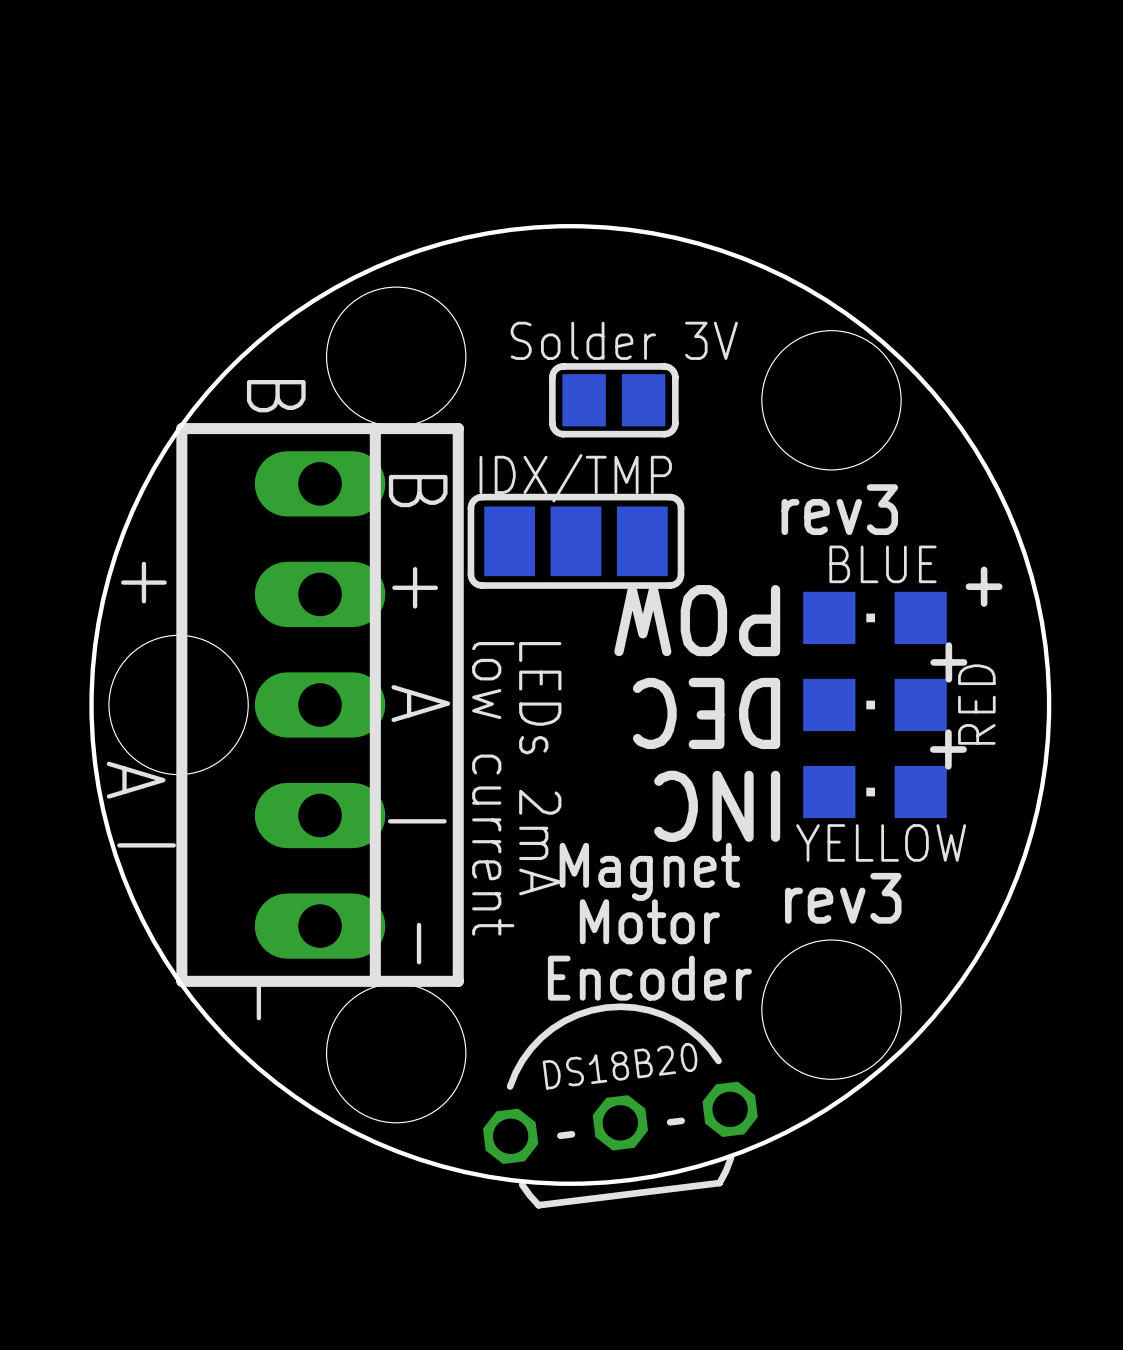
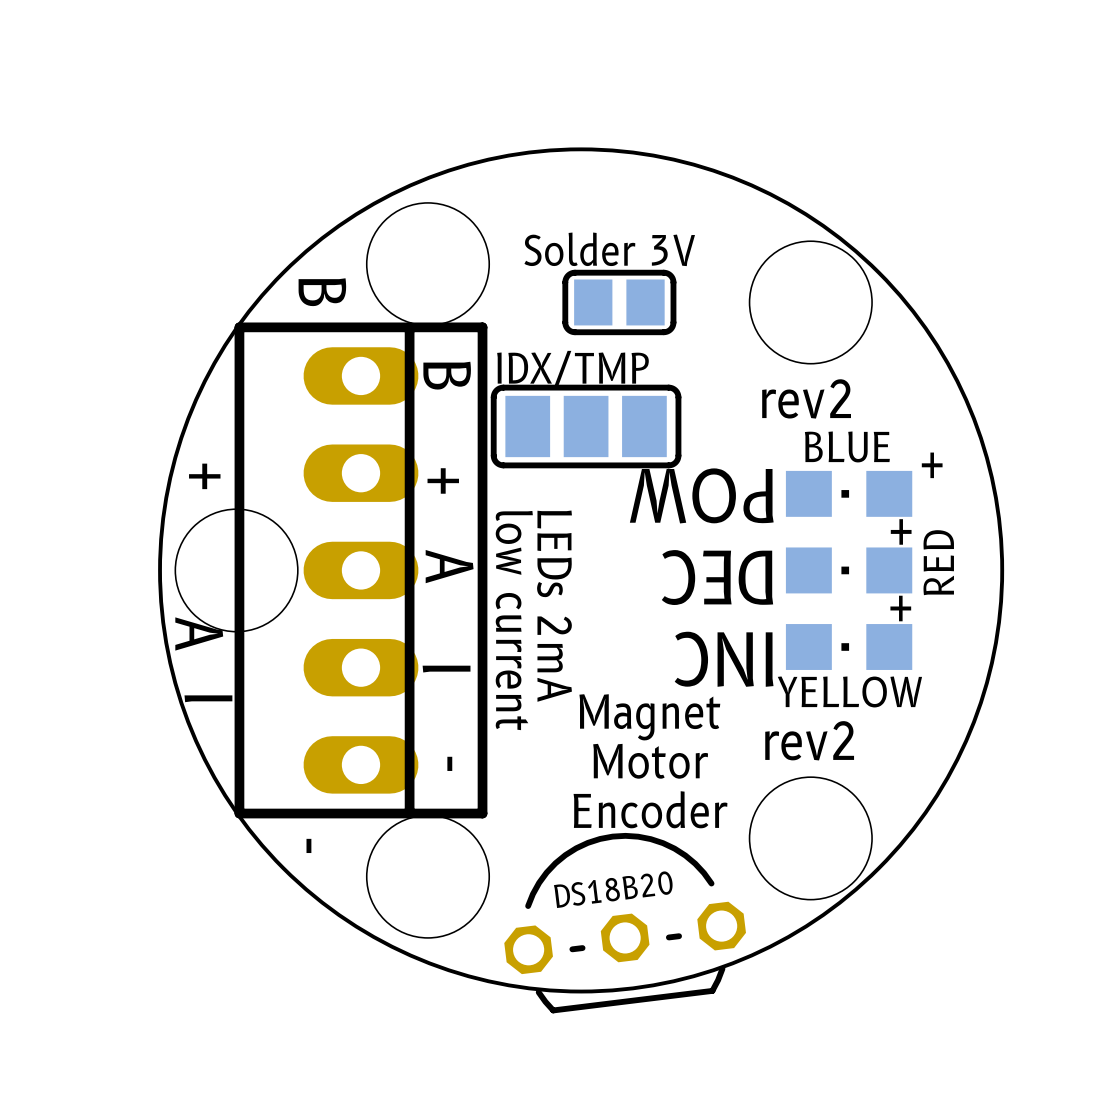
text: rev3 (839, 509) -> rev2 (806, 398)
text: rev3 (843, 898) -> rev2 (809, 740)

